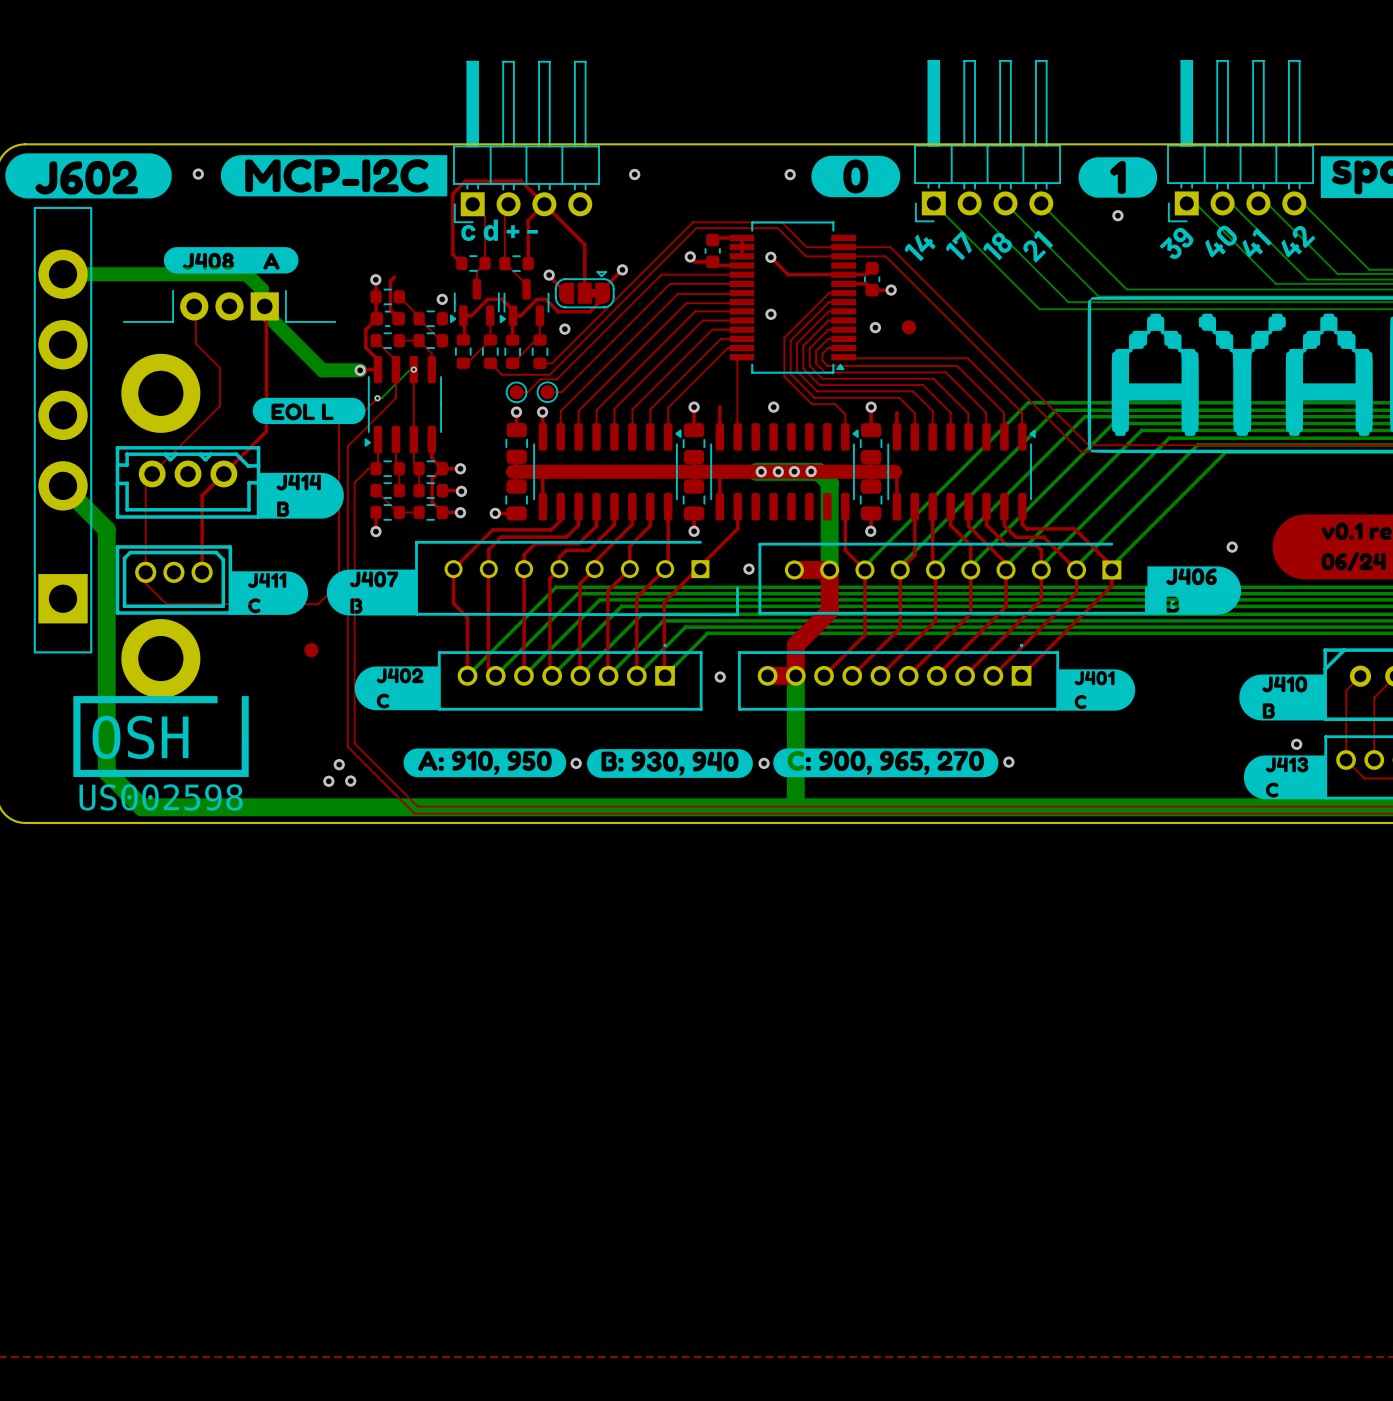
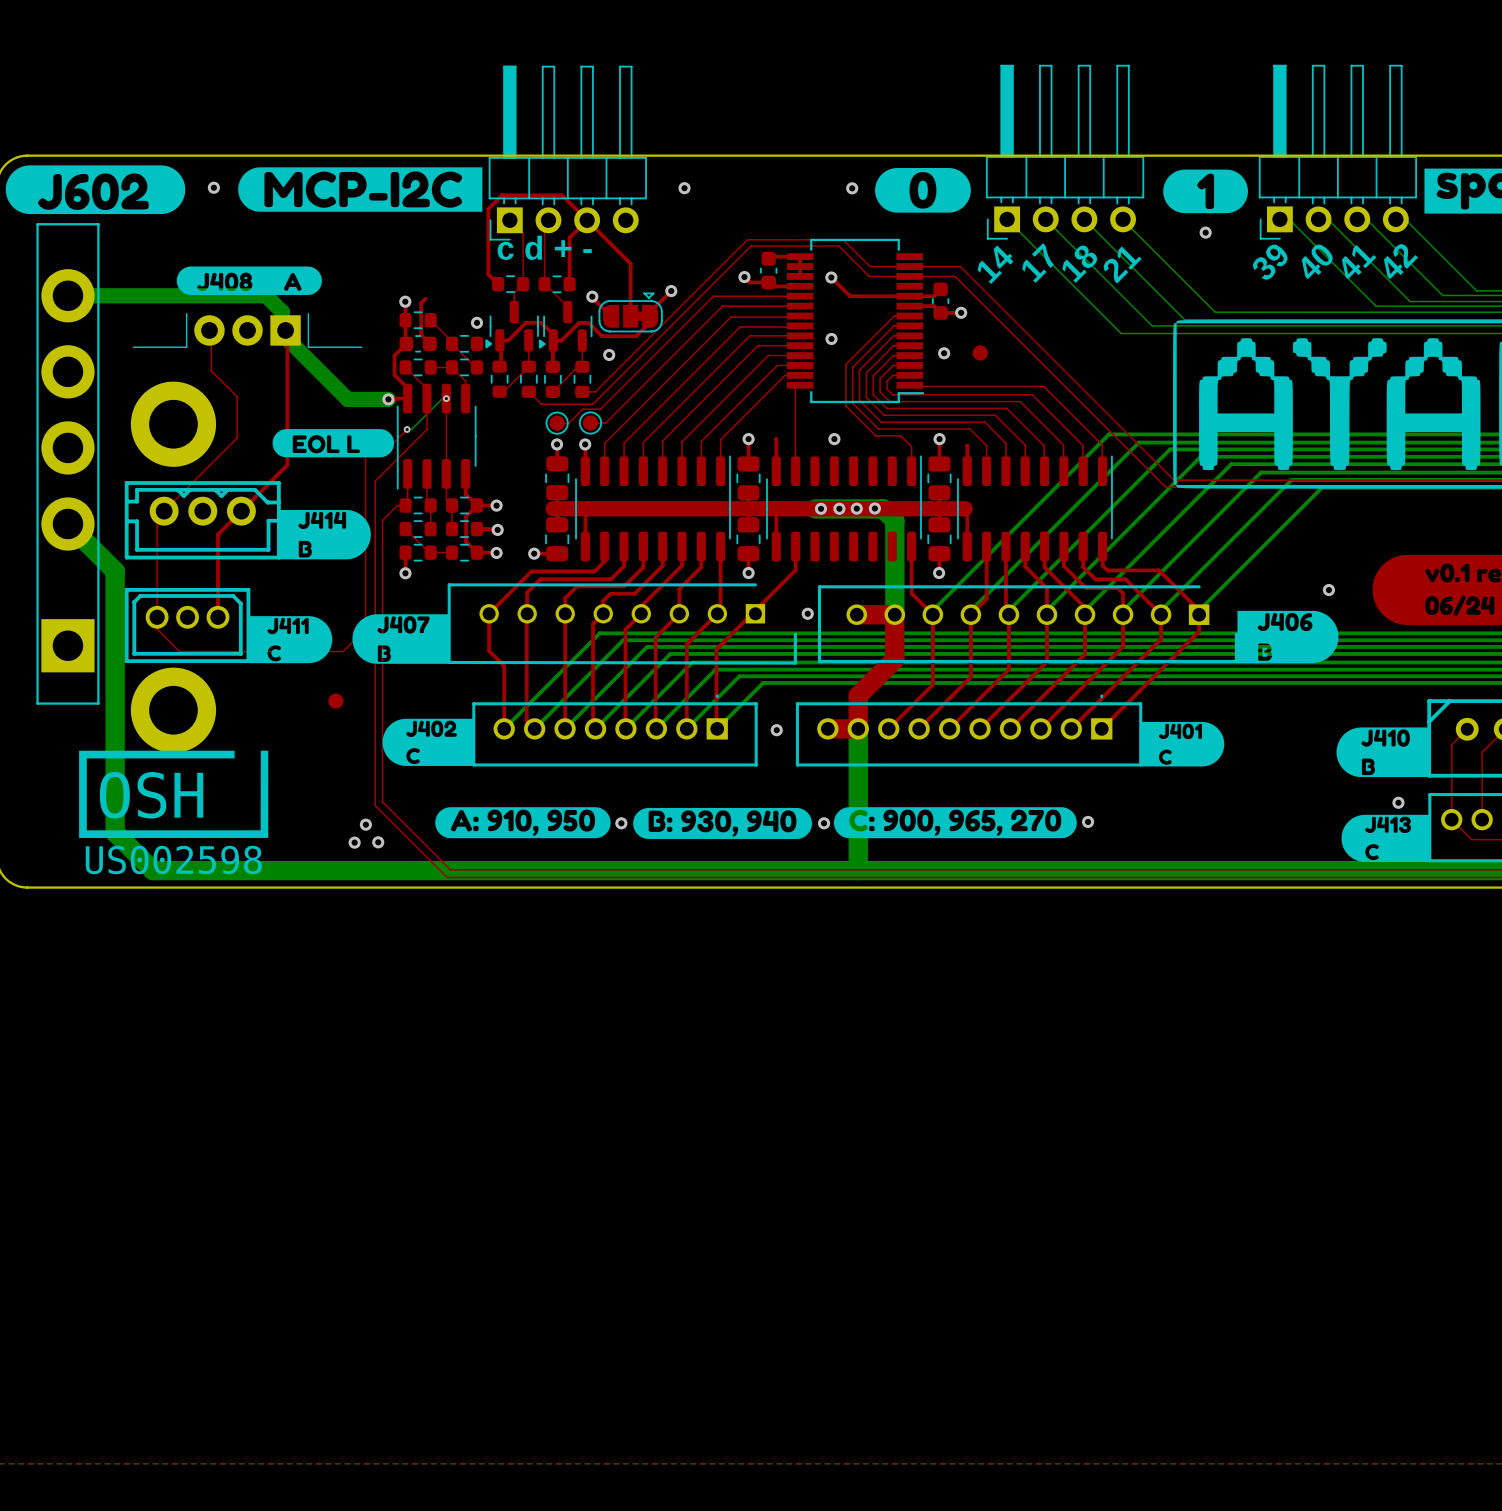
part footprint: [729, 221, 856, 374] -> [786, 238, 925, 404]
part footprint: [364, 355, 442, 454] -> [396, 383, 477, 490]
part footprint: [533, 423, 682, 521] -> [575, 455, 731, 562]
part footprint: [710, 423, 859, 521] -> [766, 455, 922, 562]
part footprint: [887, 423, 1036, 521] -> [957, 455, 1113, 562]

